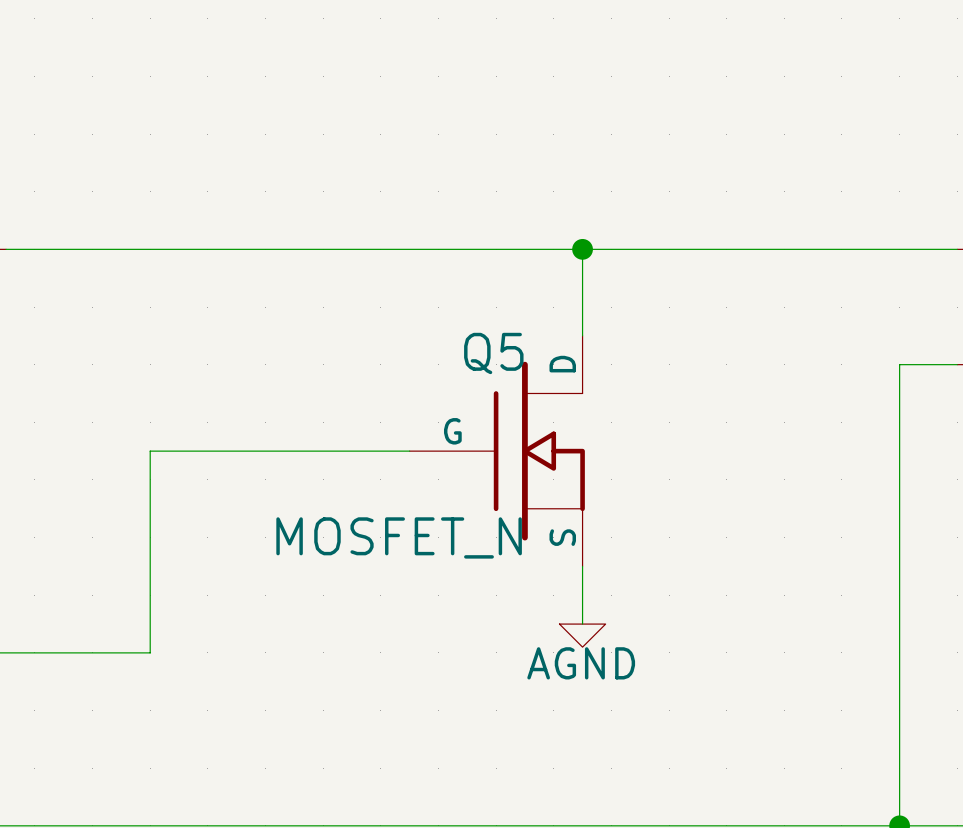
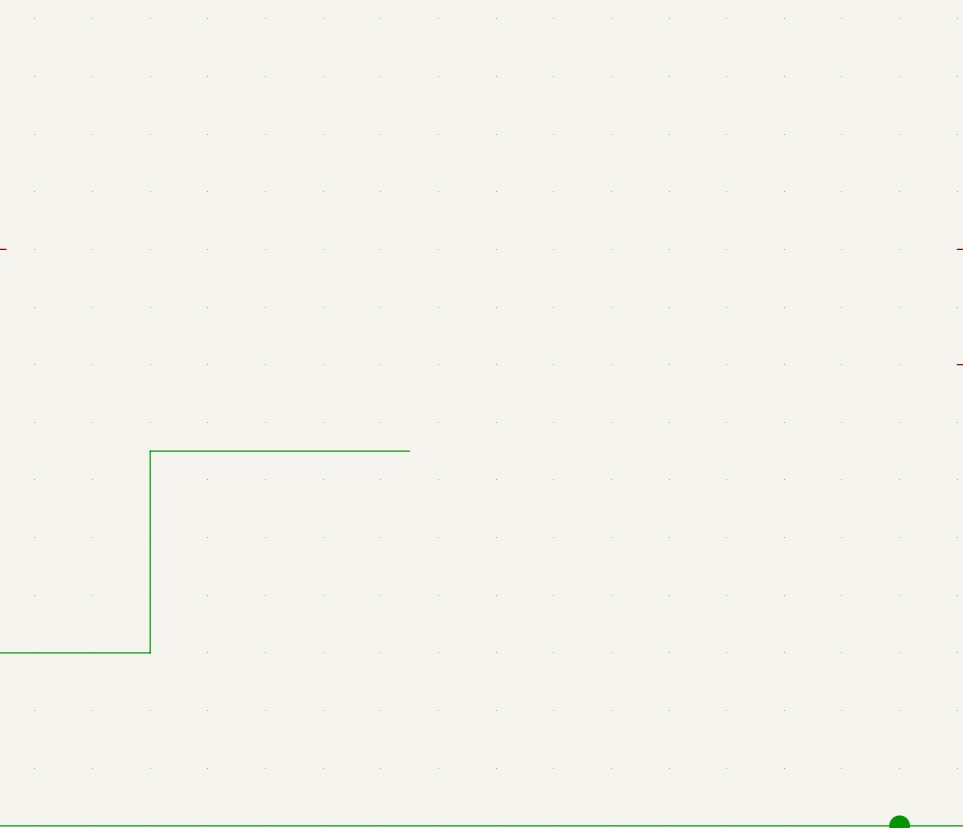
wire: (6, 249) (957, 249) -> none
wire: (582, 249) (582, 335) -> none
junction: (582, 249) -> none
wire: (957, 364) (899, 364) (899, 825) -> none
Q5: MOSFET_N (497, 451) -> none
wire: (582, 566) (582, 624) -> none
power symbol: AGND (582, 635) -> none

